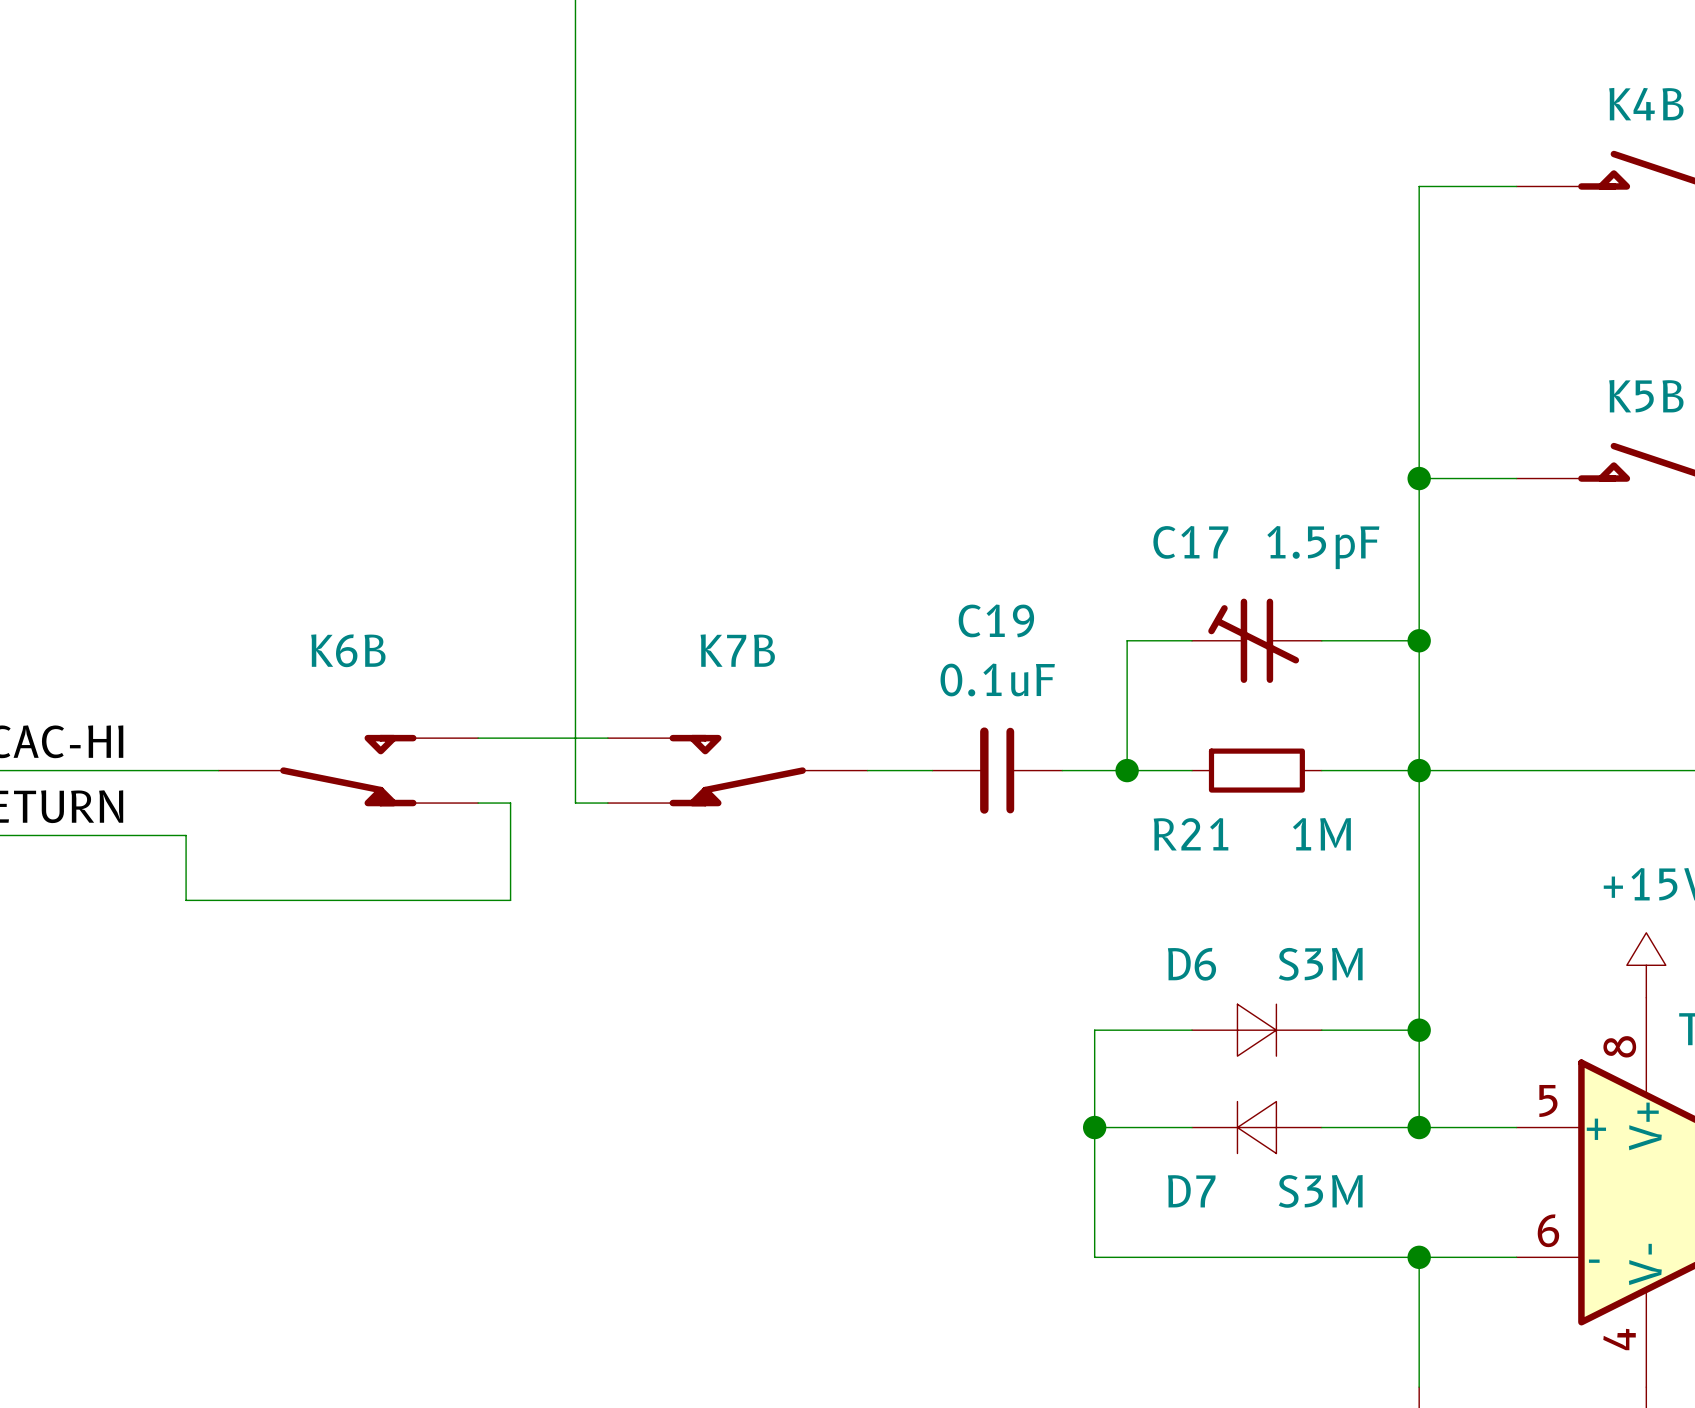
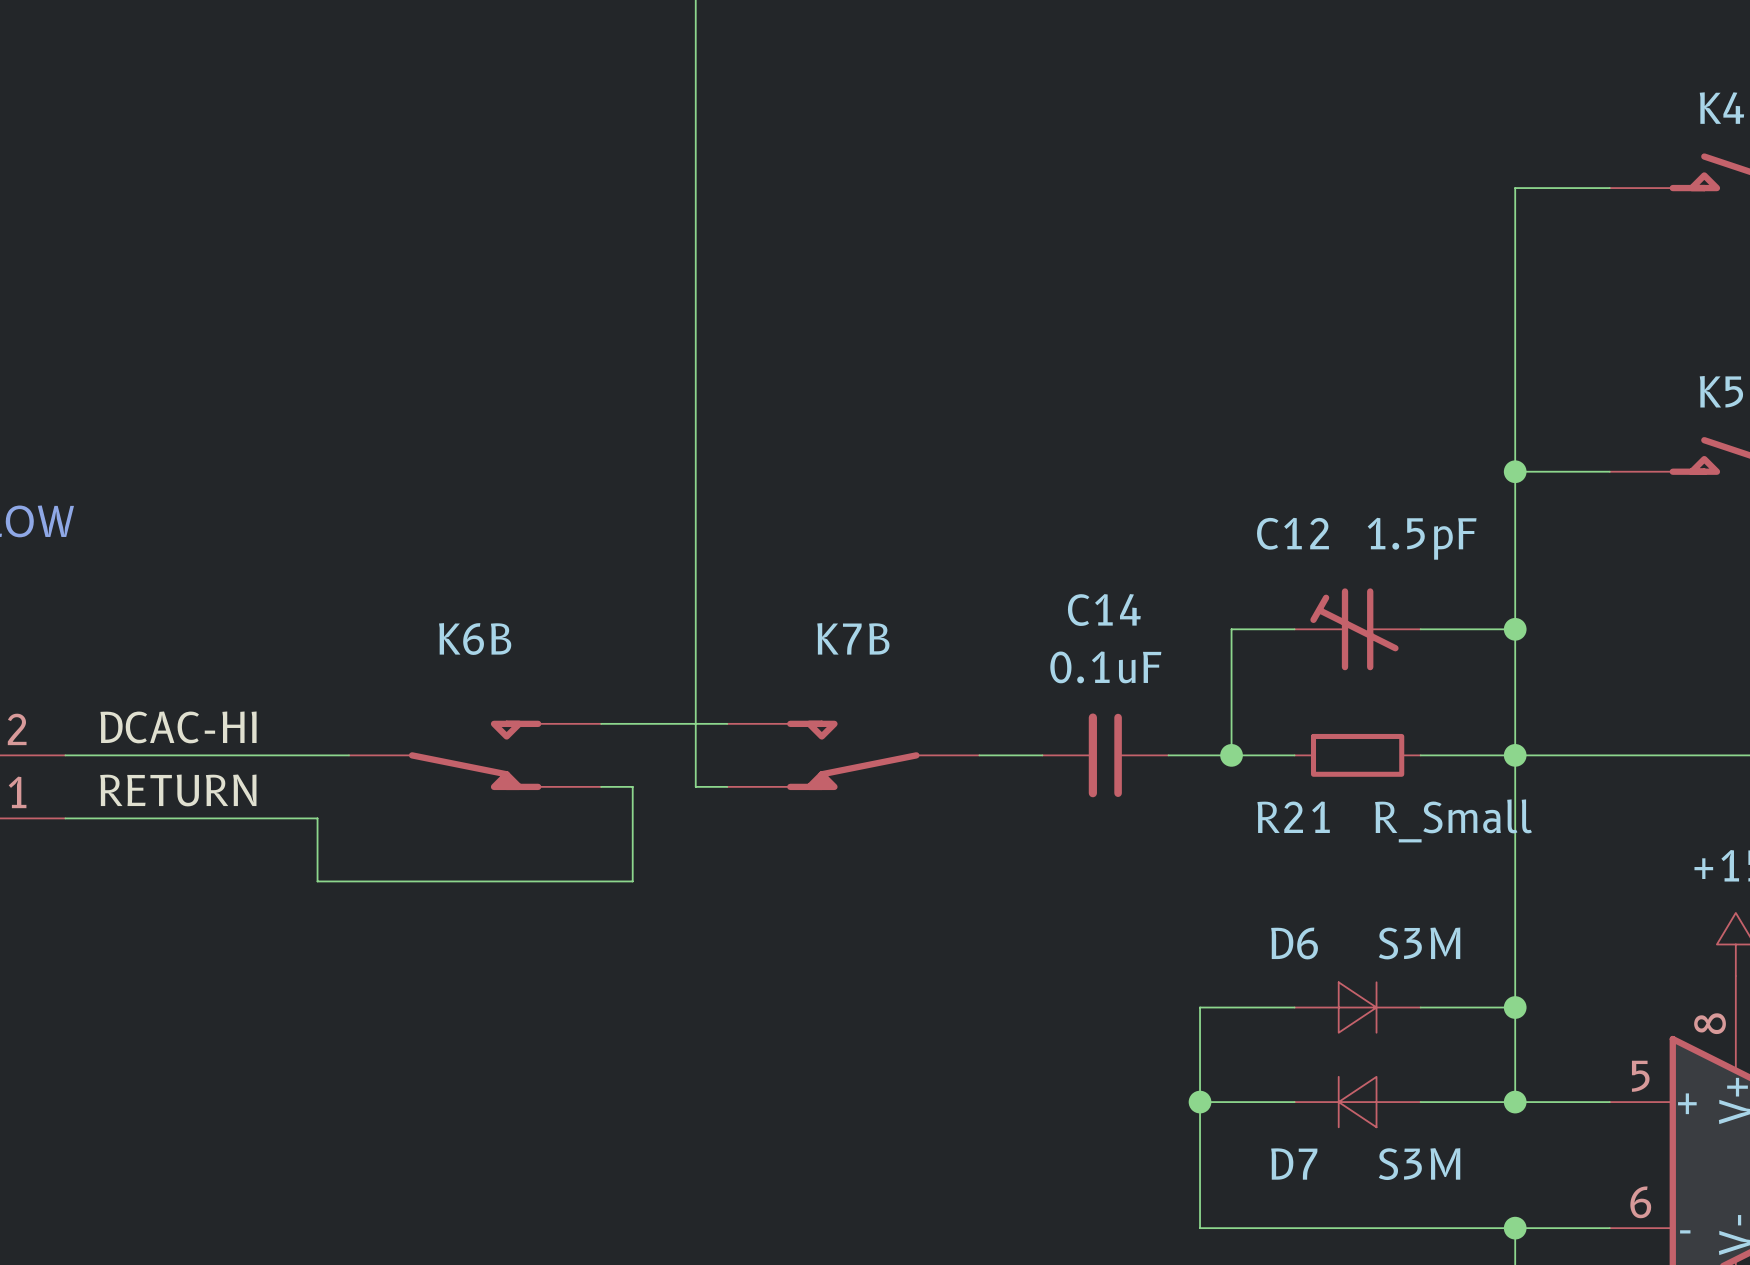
C17 name: C17 (1190, 542) -> C12 (1292, 533)
C19 name: C19 (996, 620) -> C14 (1104, 610)
R21 value: 1M (1321, 834) -> R_Small (1453, 820)

